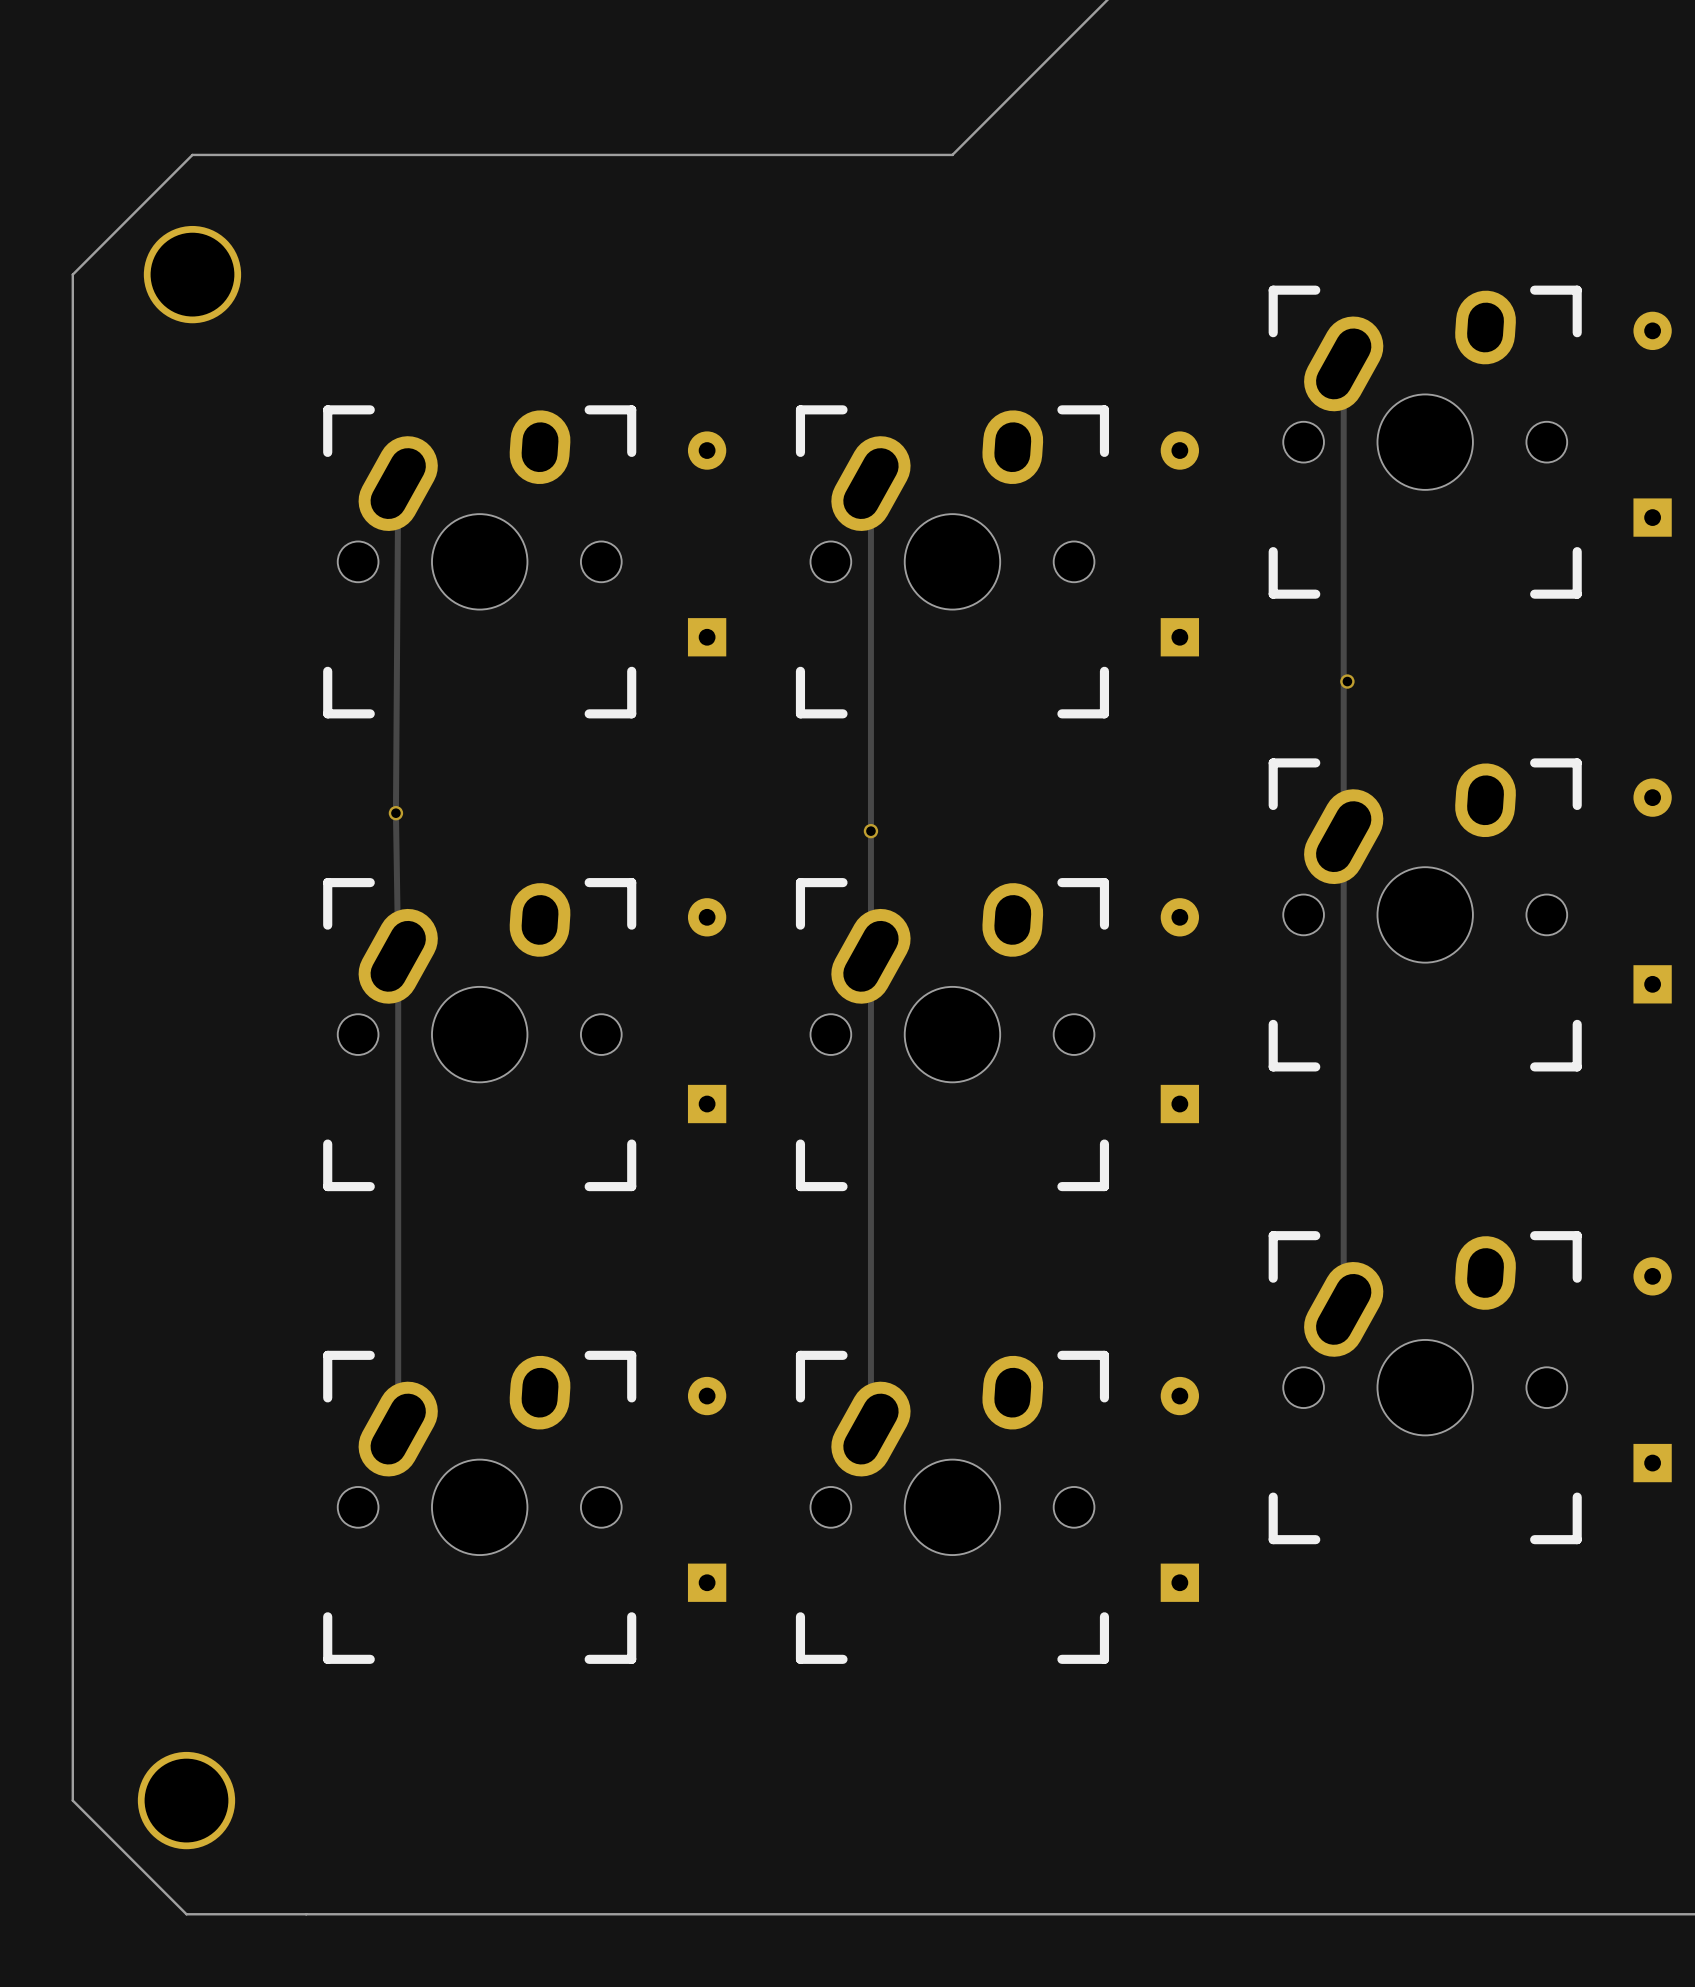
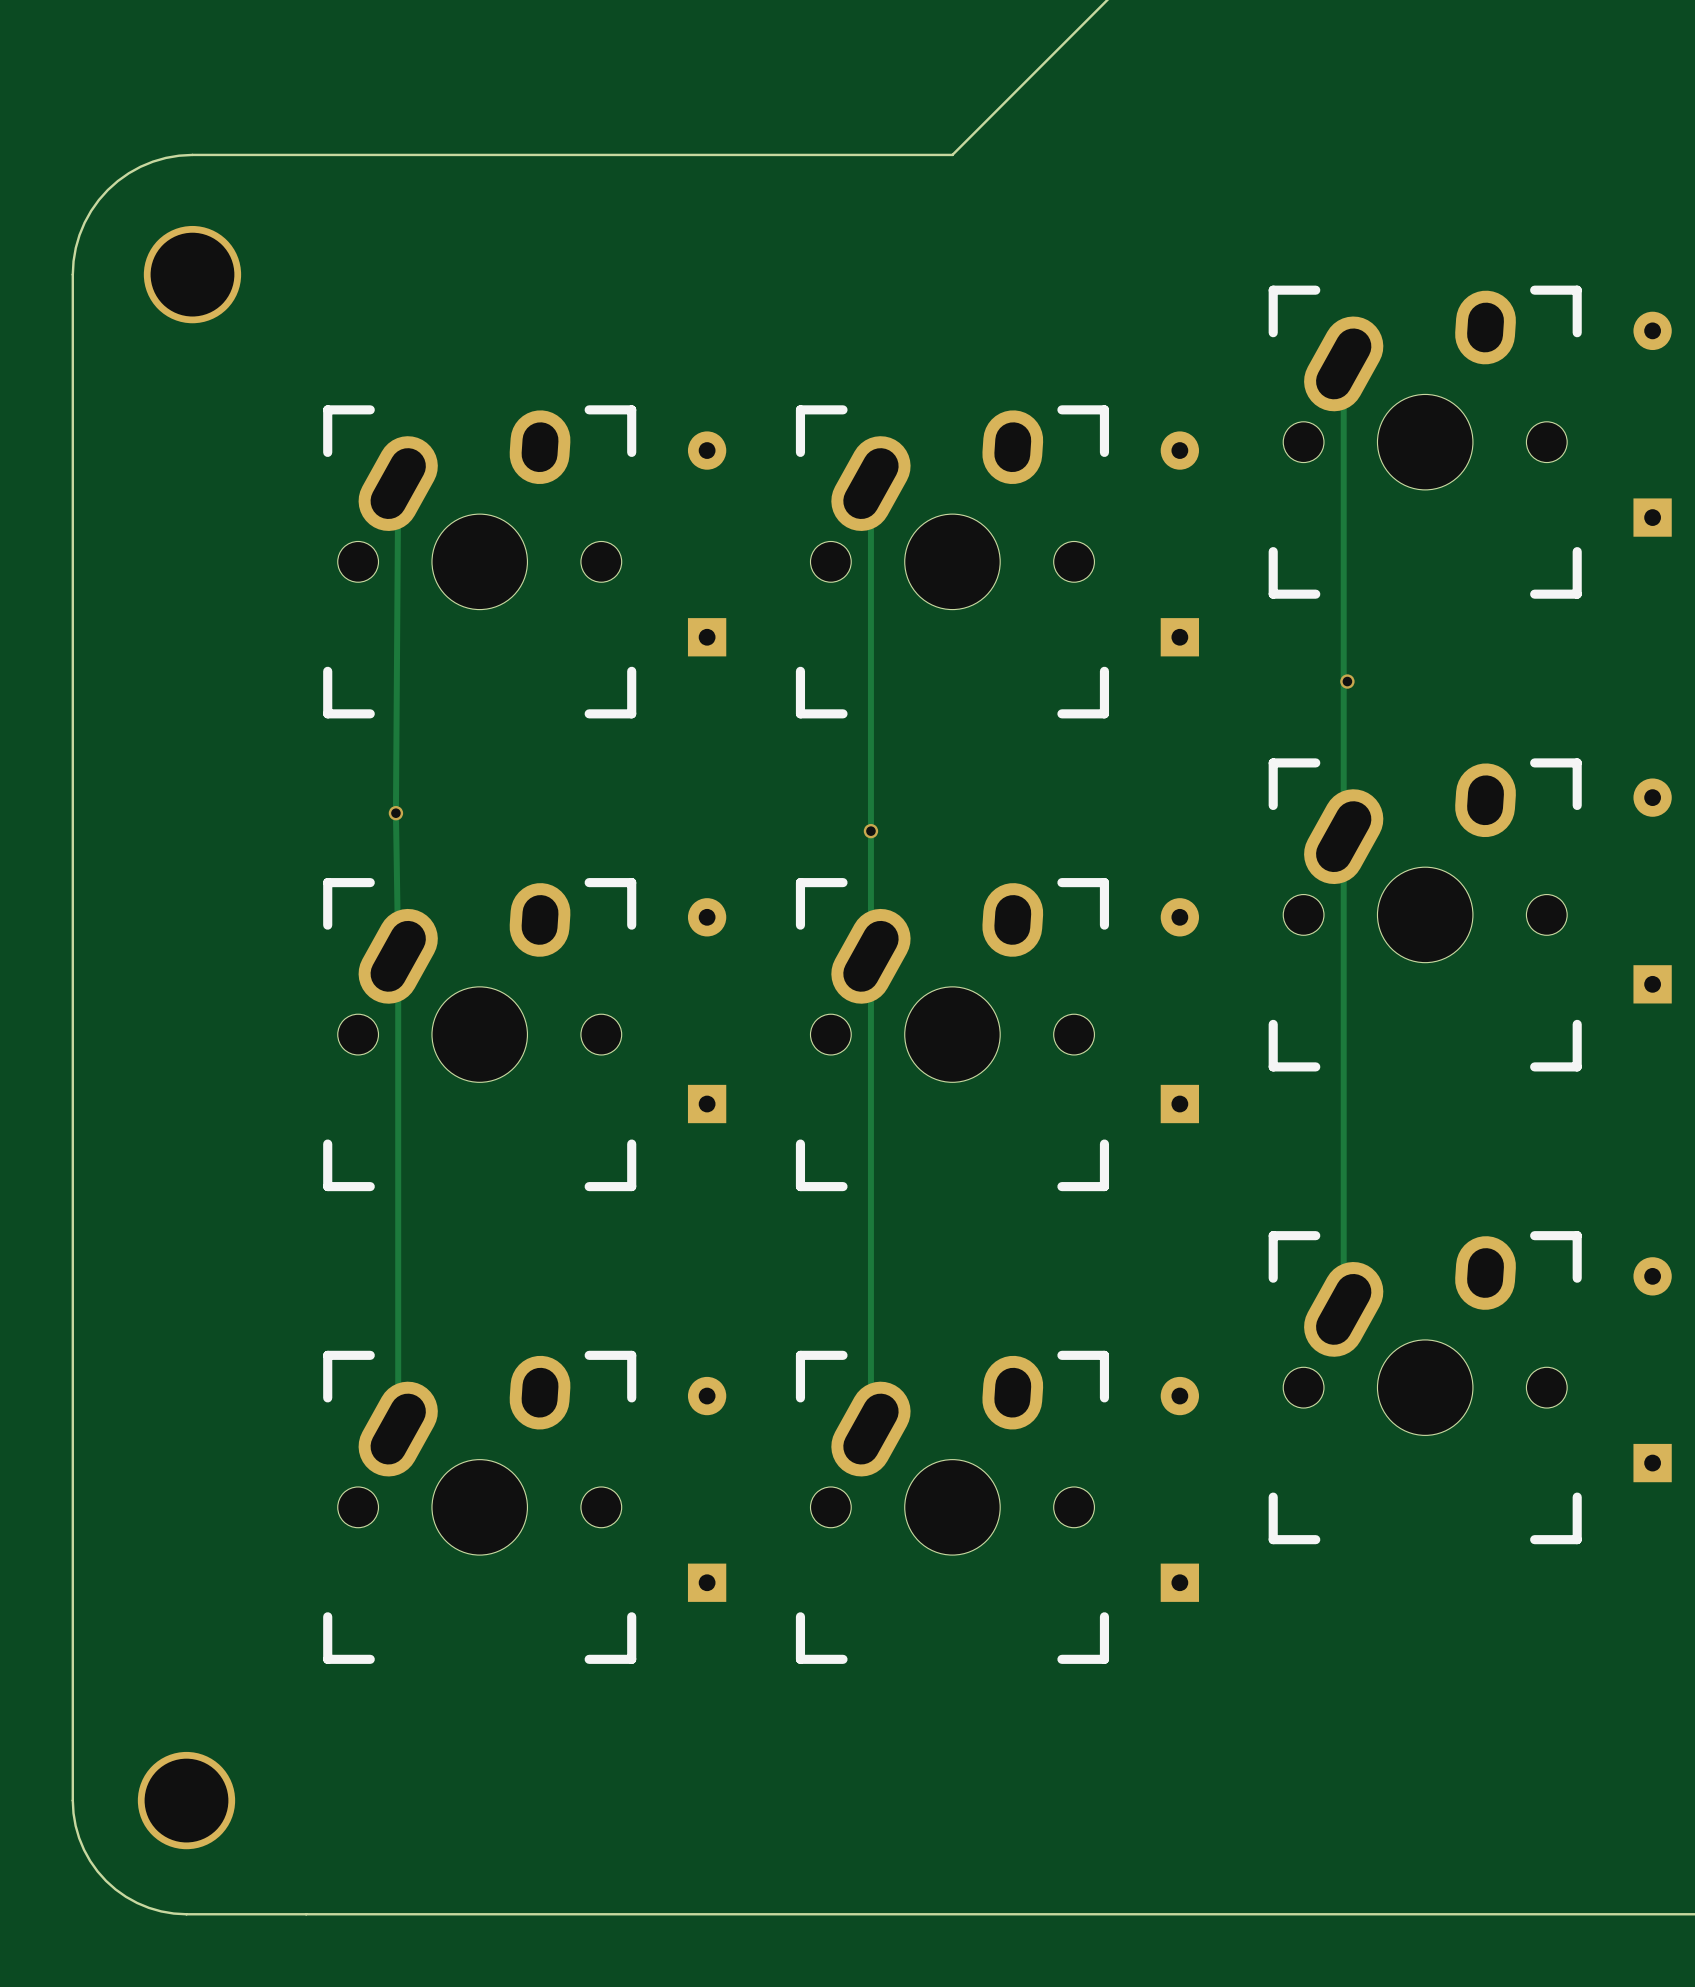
board edge: (192, 154) (72, 274) -> (192, 154) (165, 157) (140, 166) (117, 181) (107, 189) (98, 199) (84, 222) (75, 247) (72, 274)
board edge: (72, 1800) (186, 1914) -> (72, 1800) (75, 1825) (84, 1849) (106, 1880) (126, 1896) (148, 1907) (186, 1914)

